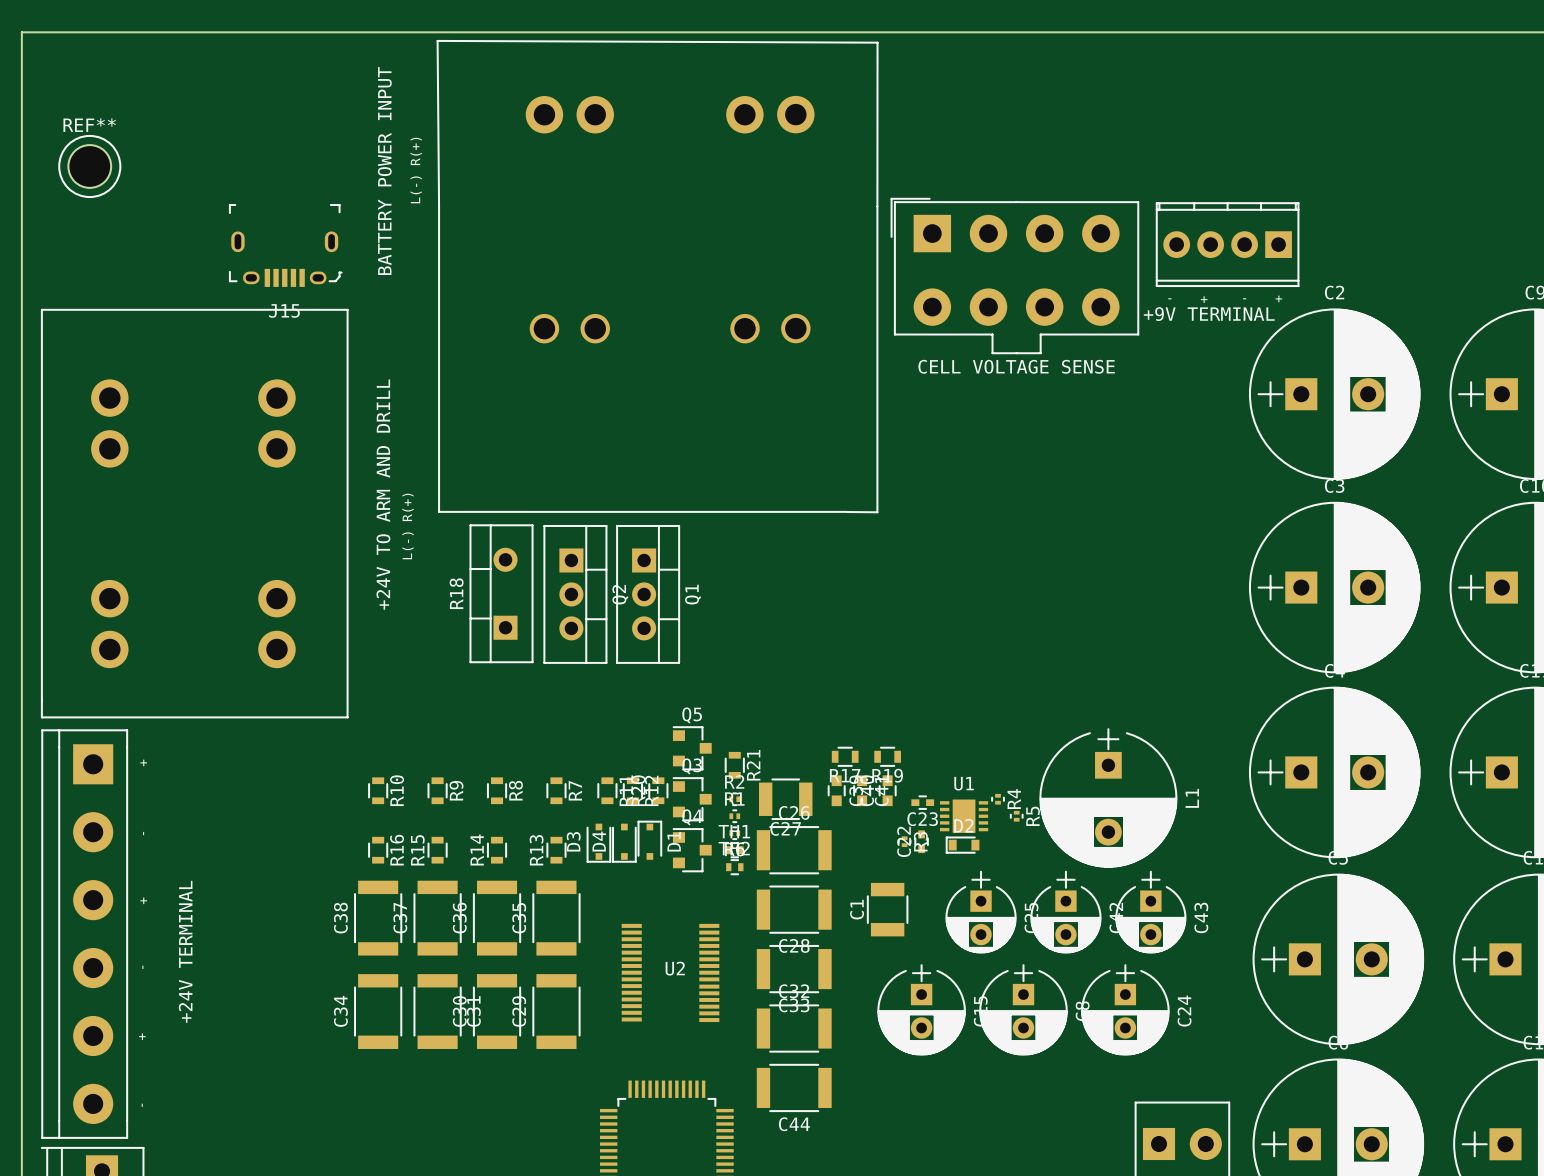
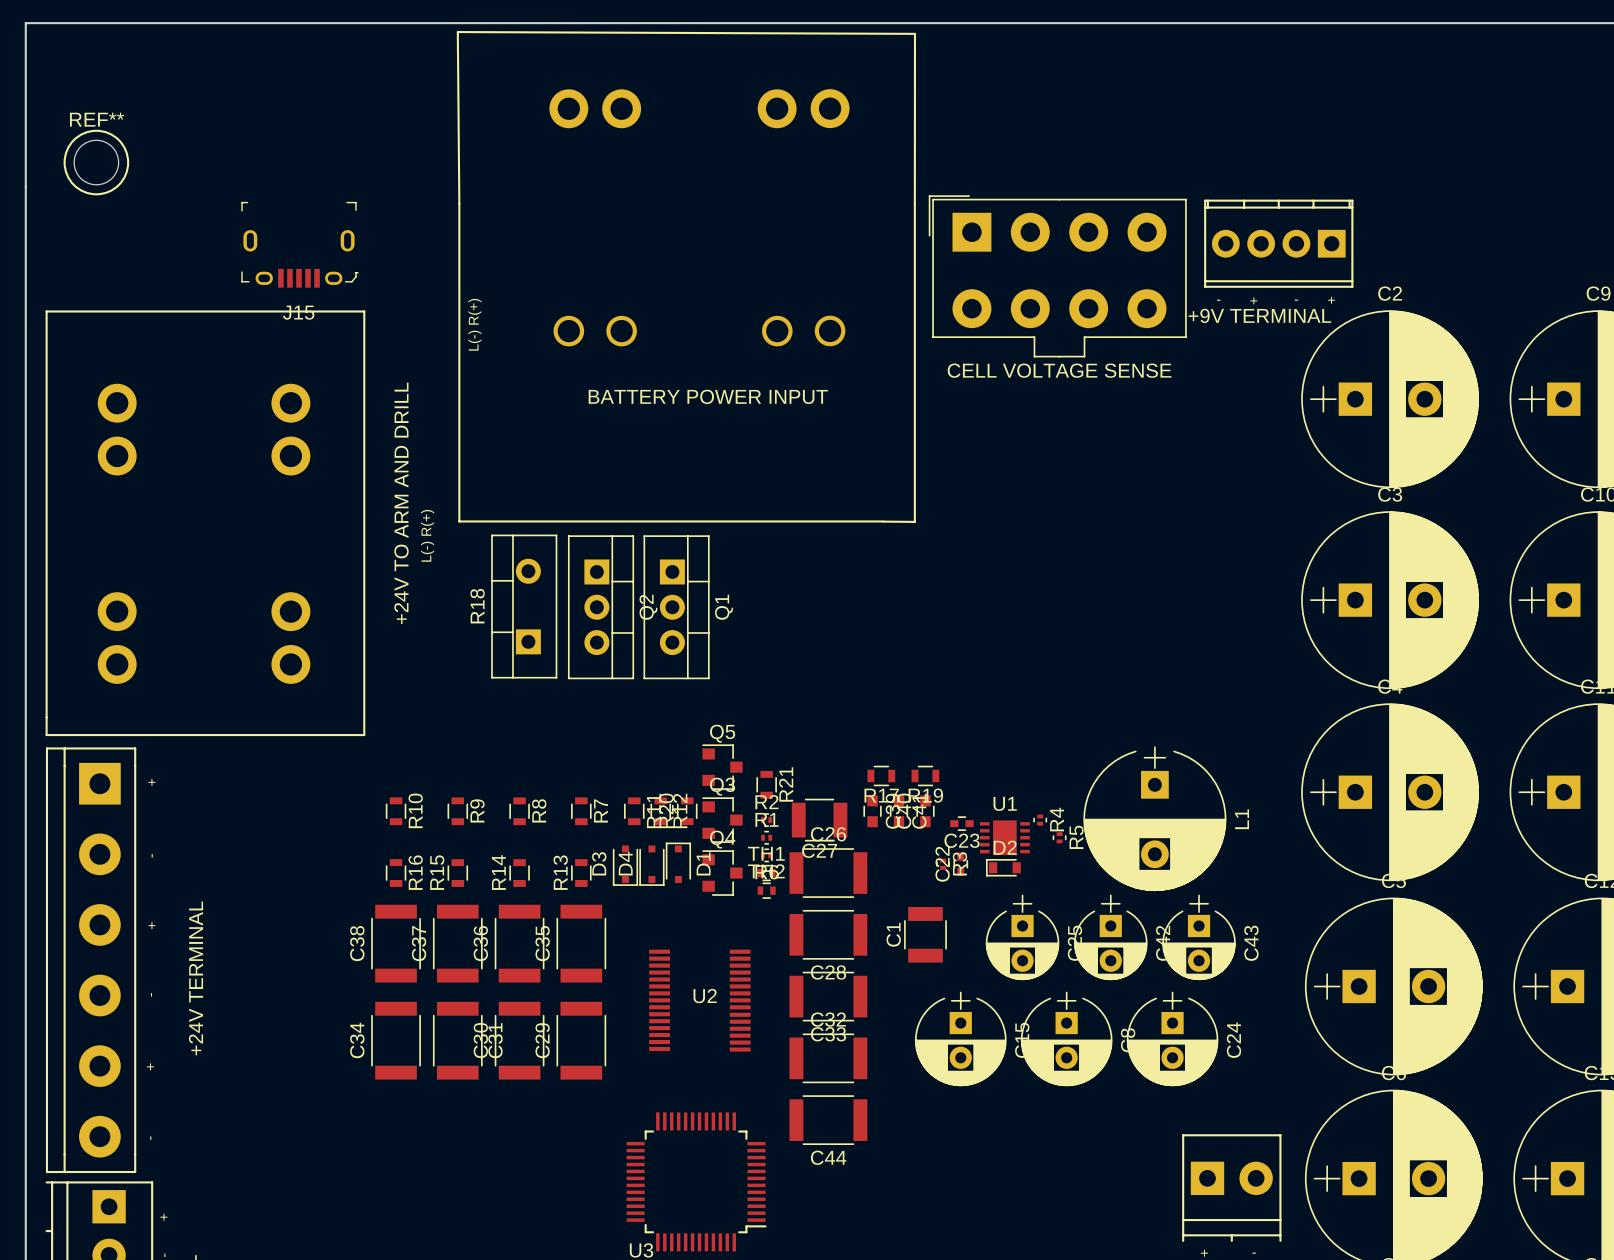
text position: L(-) R(+) (416, 170) -> L(-) R(+) (474, 324)
BATTERY POWER INPUT name rotation: 0° (384, 171) -> 90° clockwise (708, 396)
BATTERY POWER INPUT name position: BATTERY POWER INPUT (384, 171) -> BATTERY POWER INPUT (708, 396)

